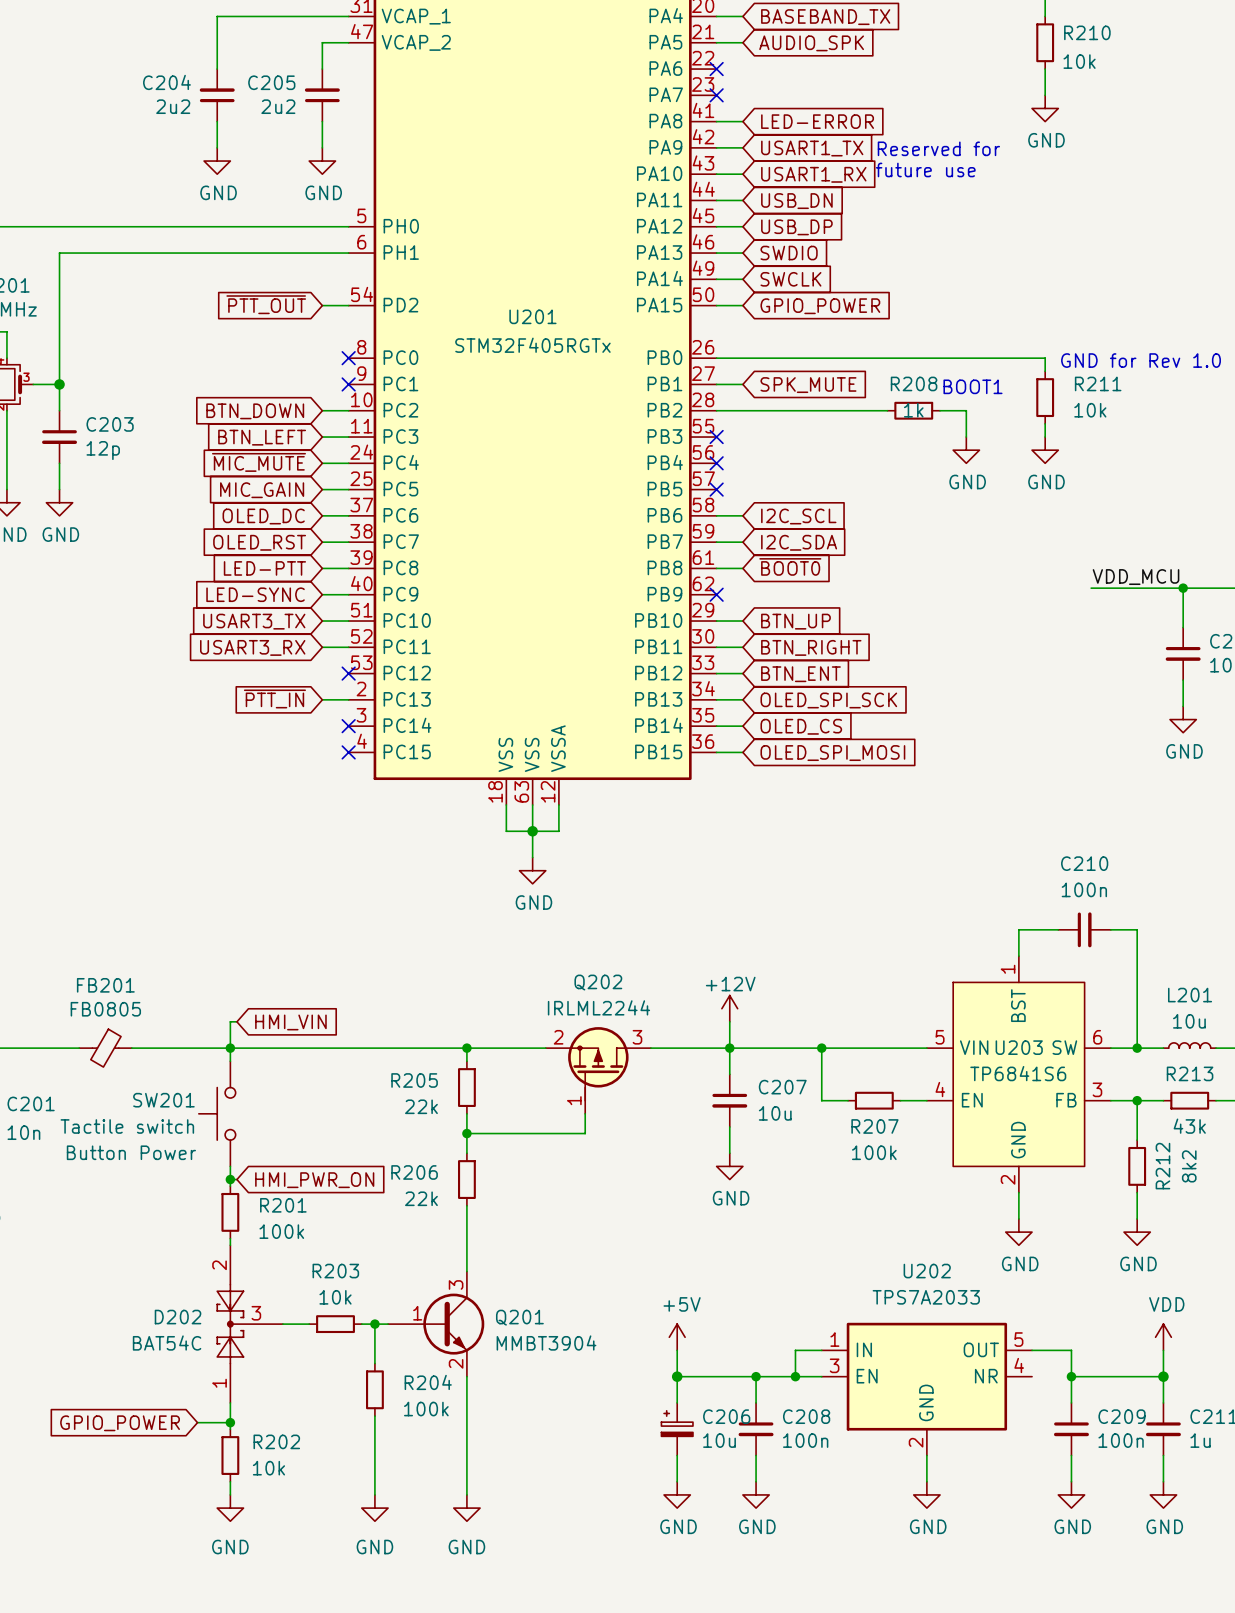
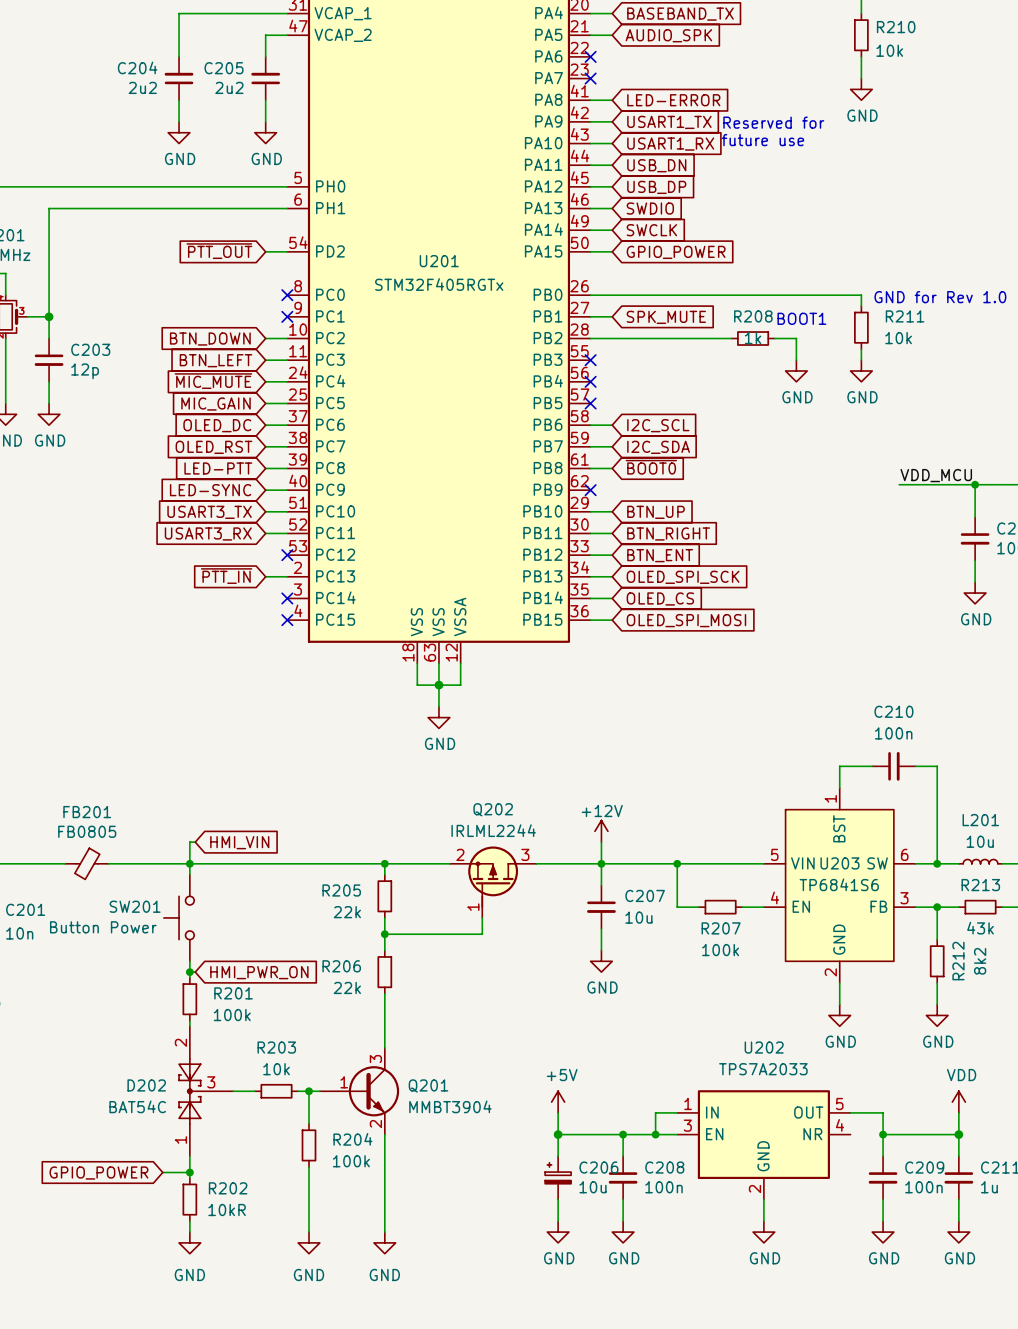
SW201 value: Tactile switch (127, 1126) -> Button Power (103, 927)
SW201 text: Button Power (131, 1152) -> none
R202 value: 10k (268, 1468) -> 10kR (227, 1210)

